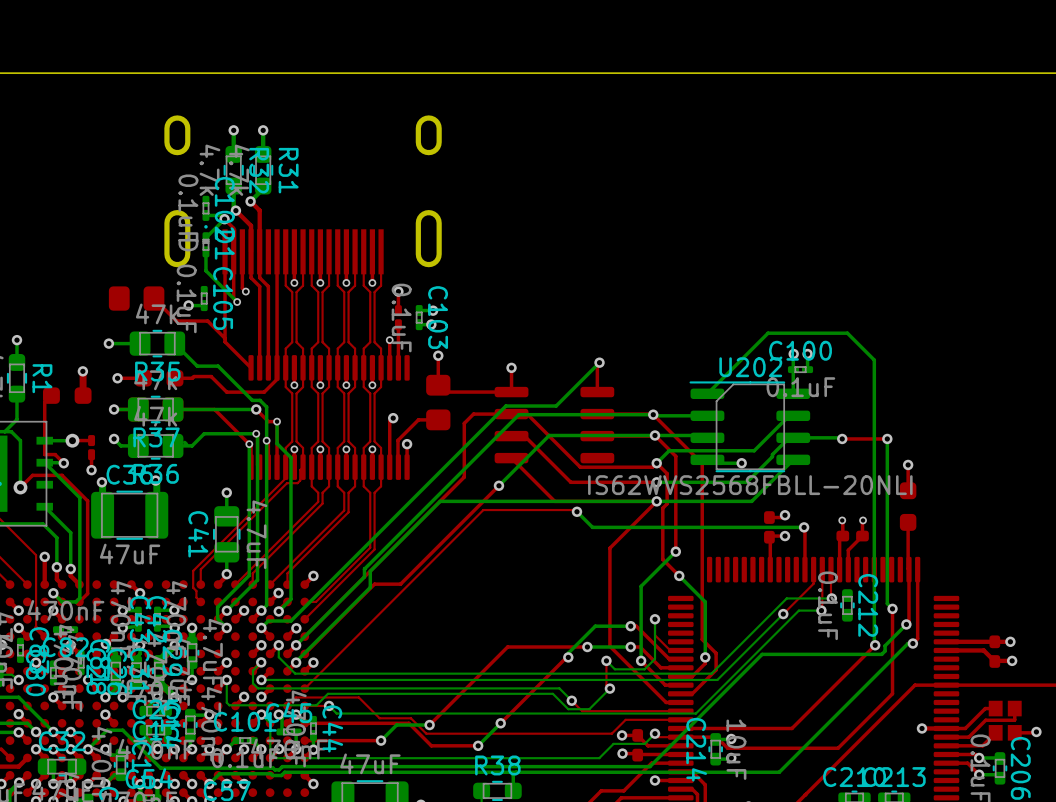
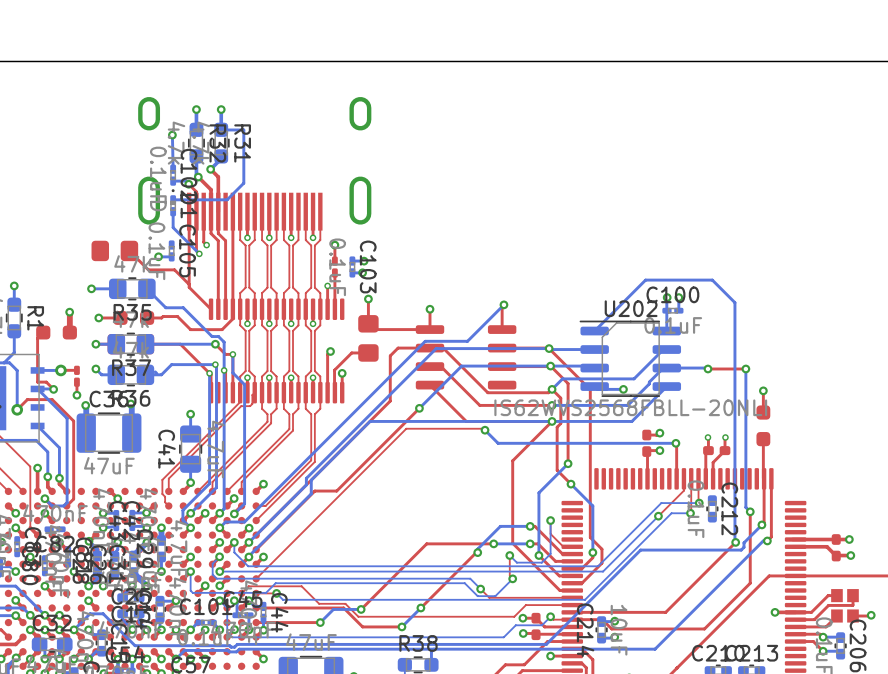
via: none -> (172, 135)
bottom track: none -> (173, 135) (173, 169)
bottom track: (224, 219) (206, 237) -> (221, 129) (243, 129) (243, 183) (227, 199) (173, 199)

